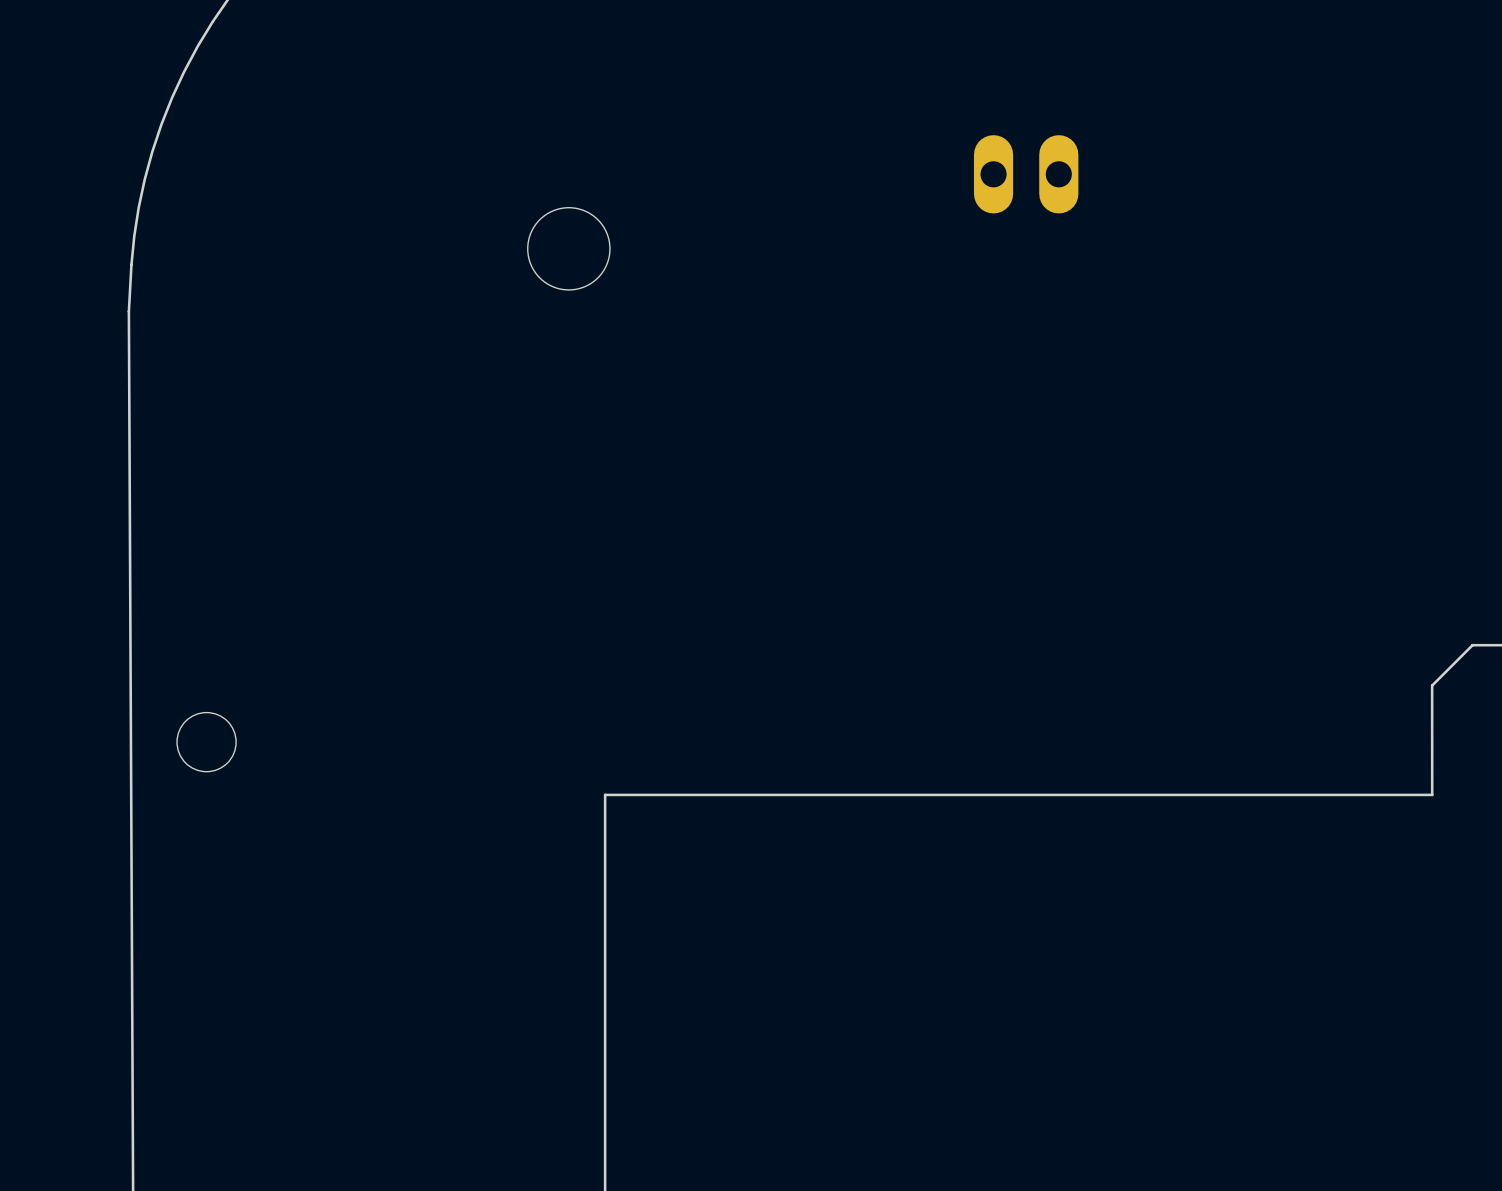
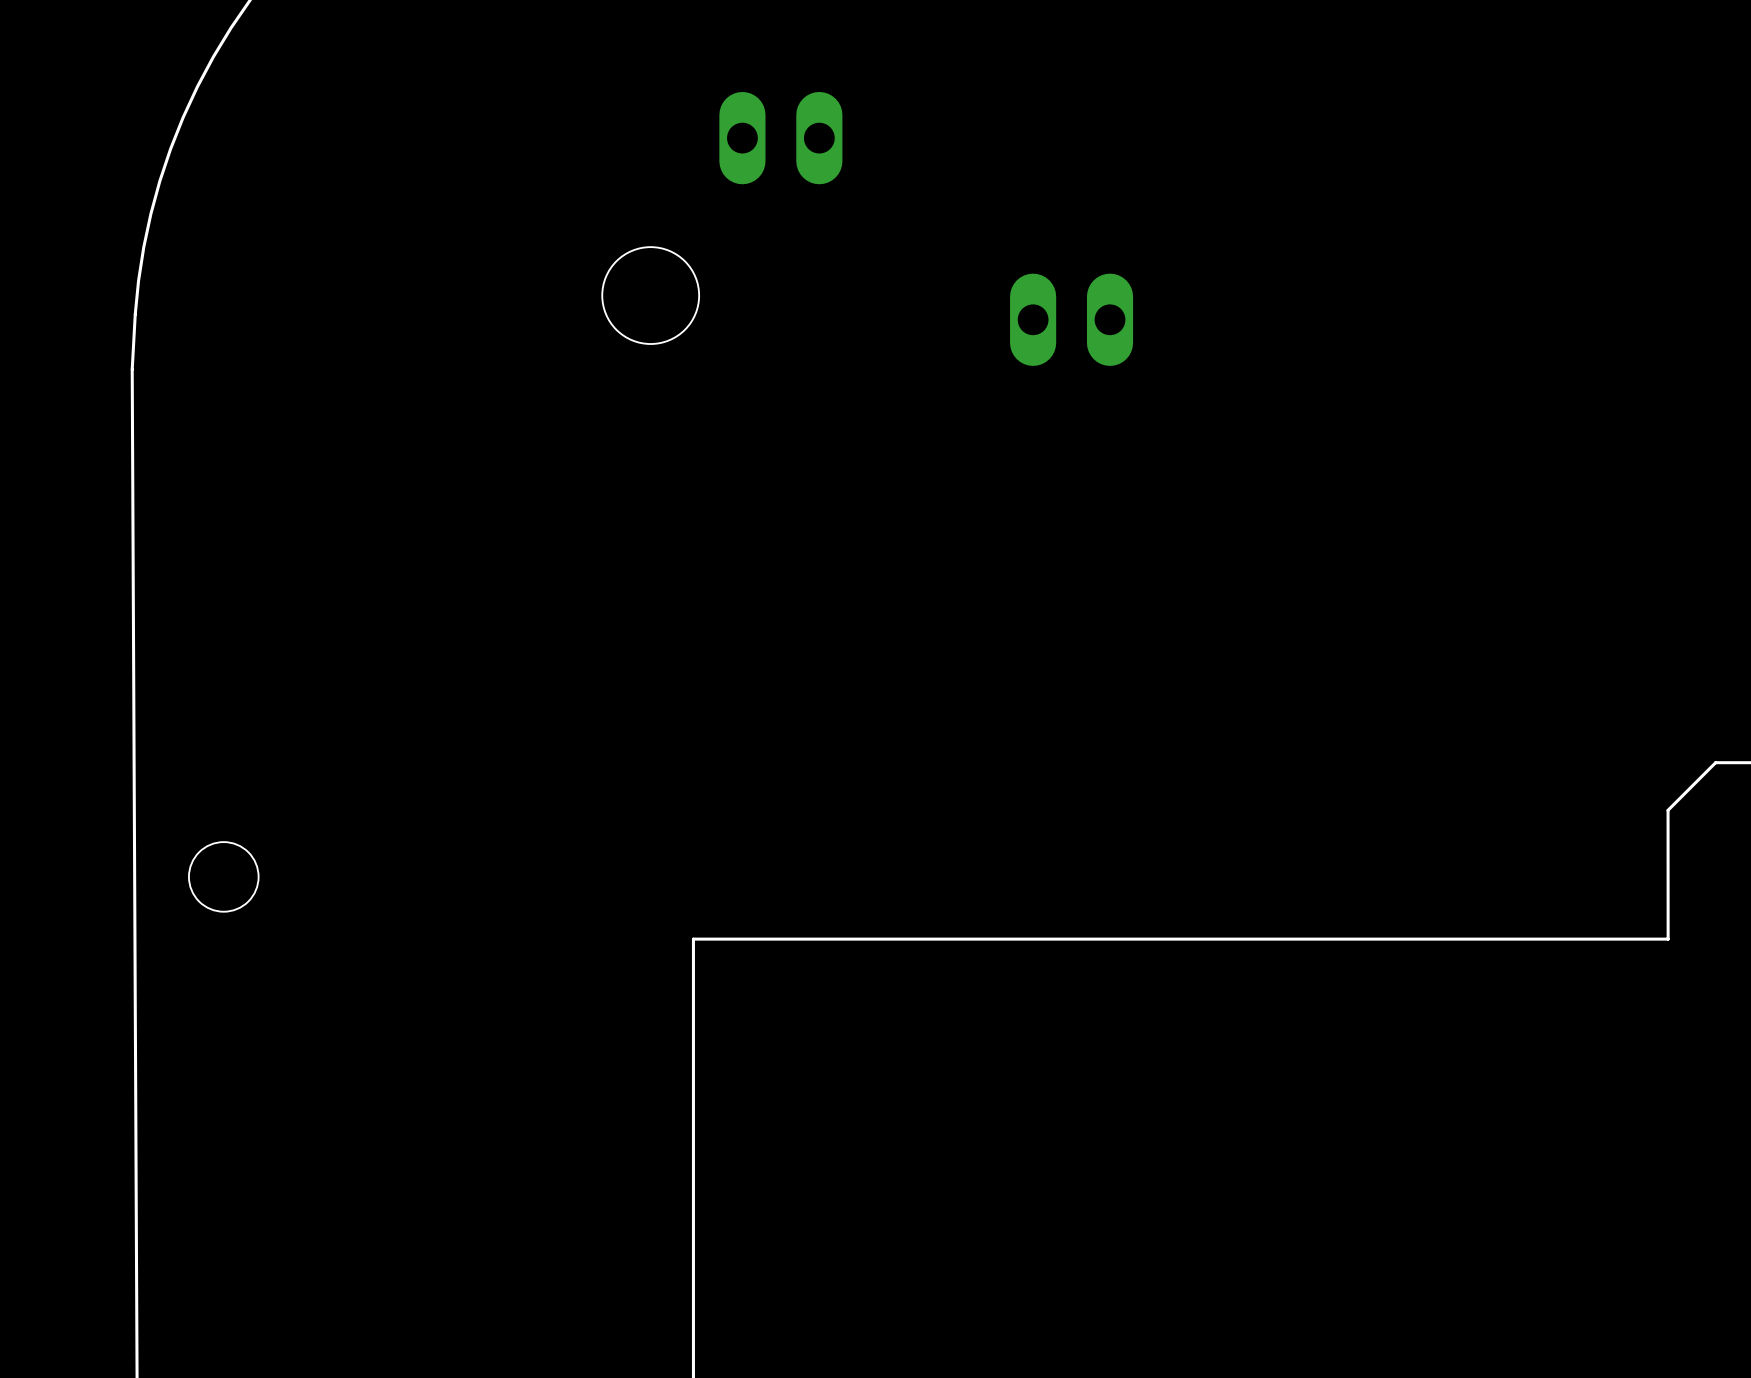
part: none -> (780, 138)
part position: (1026, 174) -> (1071, 319)

